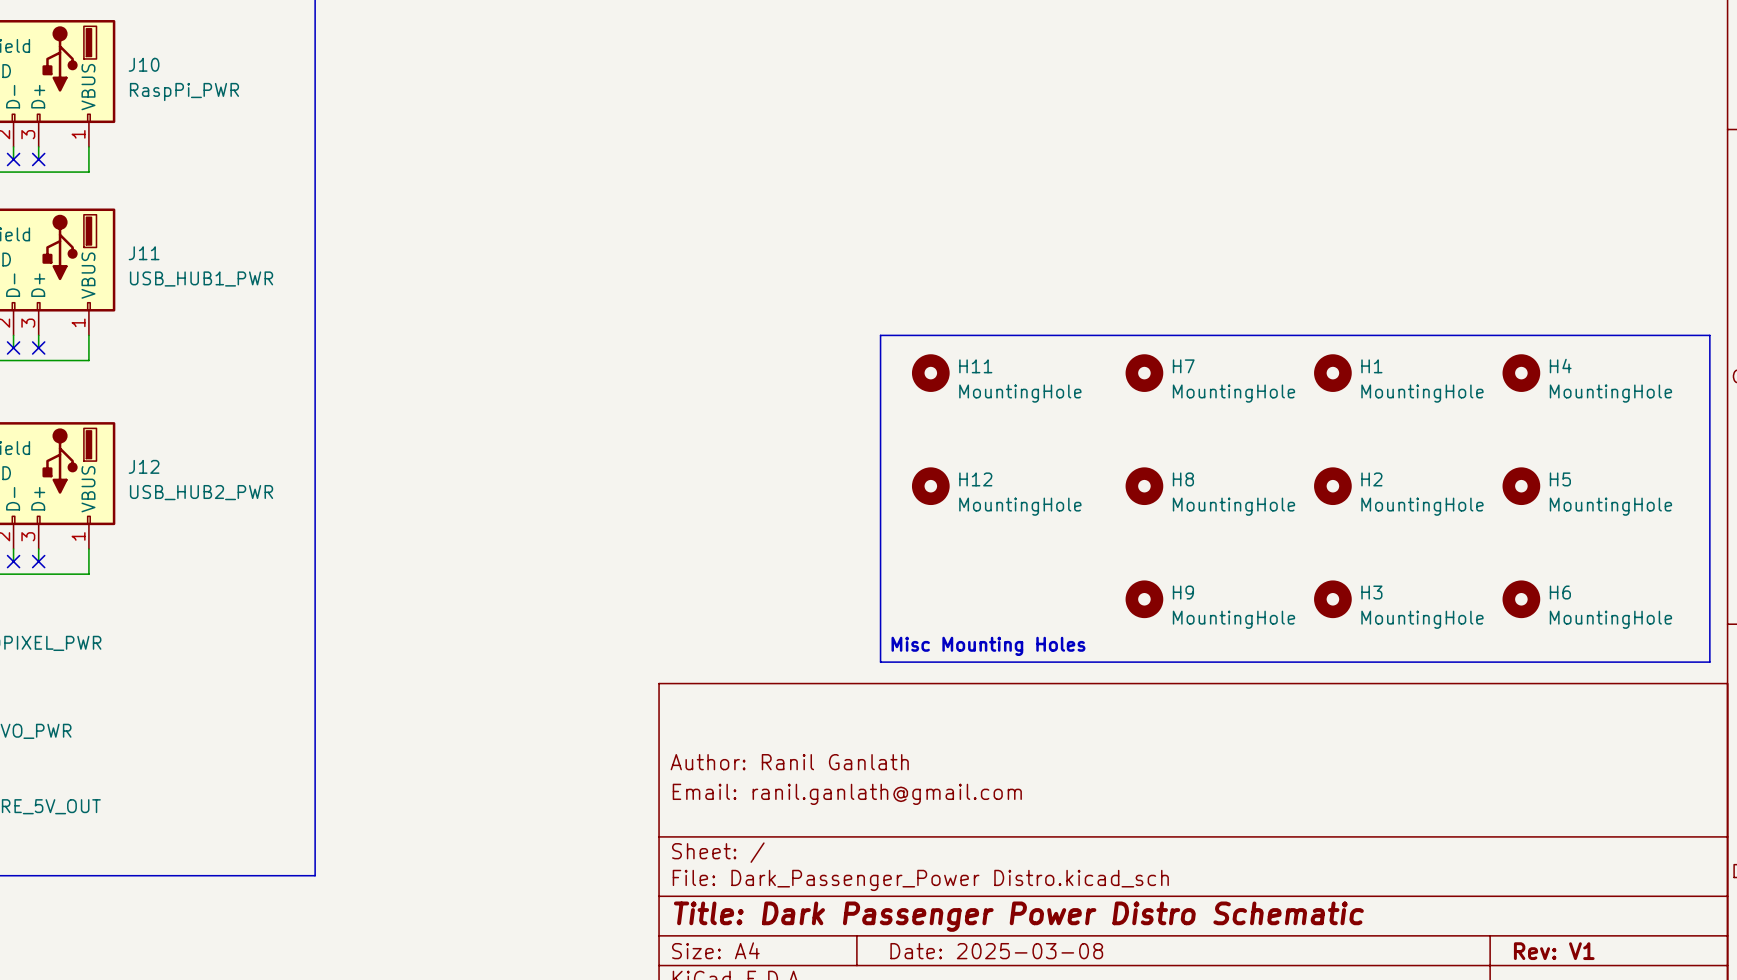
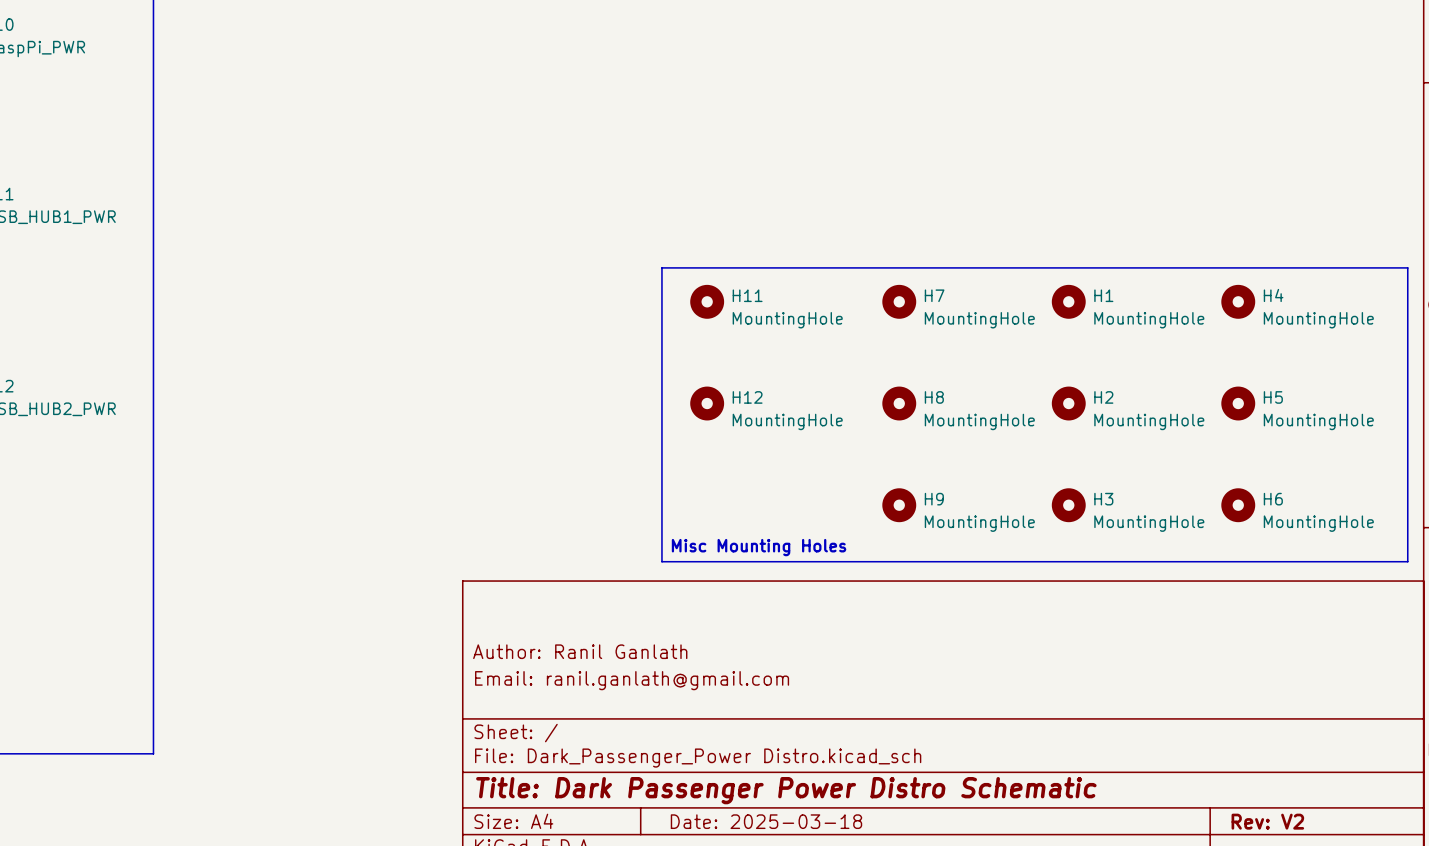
title block: Date: 2025-03-08 (996, 951) -> Date: 2025-03-18 (766, 821)
title block: Rev: V1 (1554, 951) -> Rev: V2 (1267, 821)

